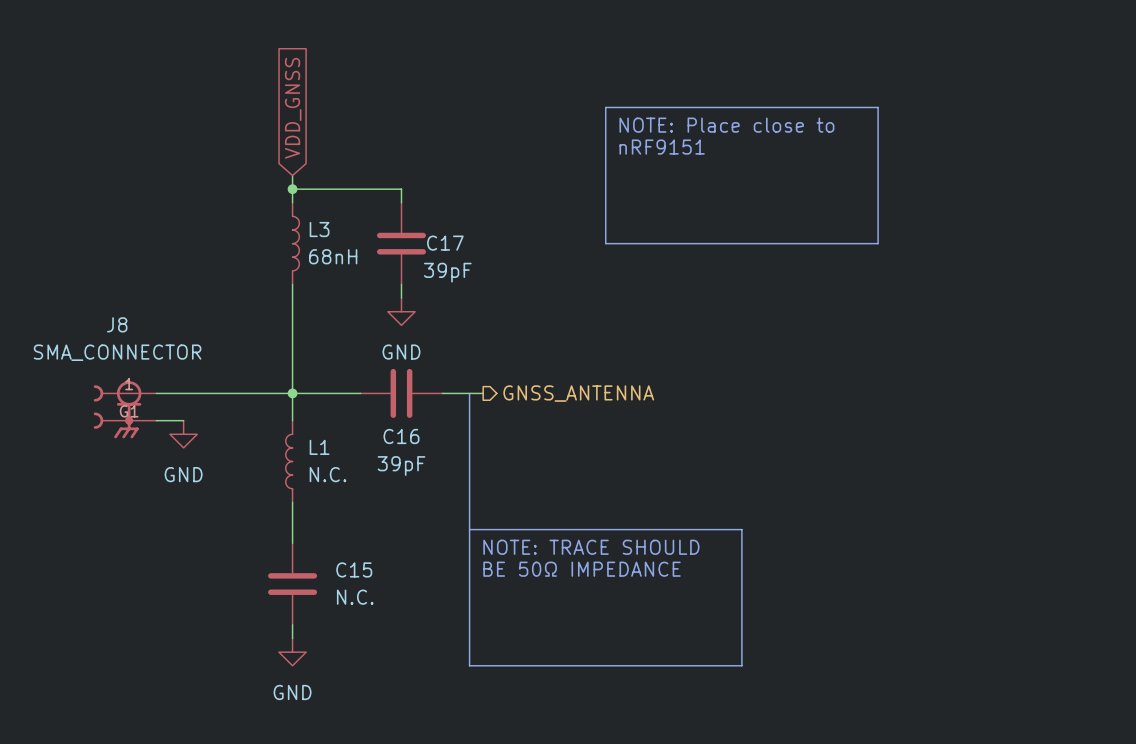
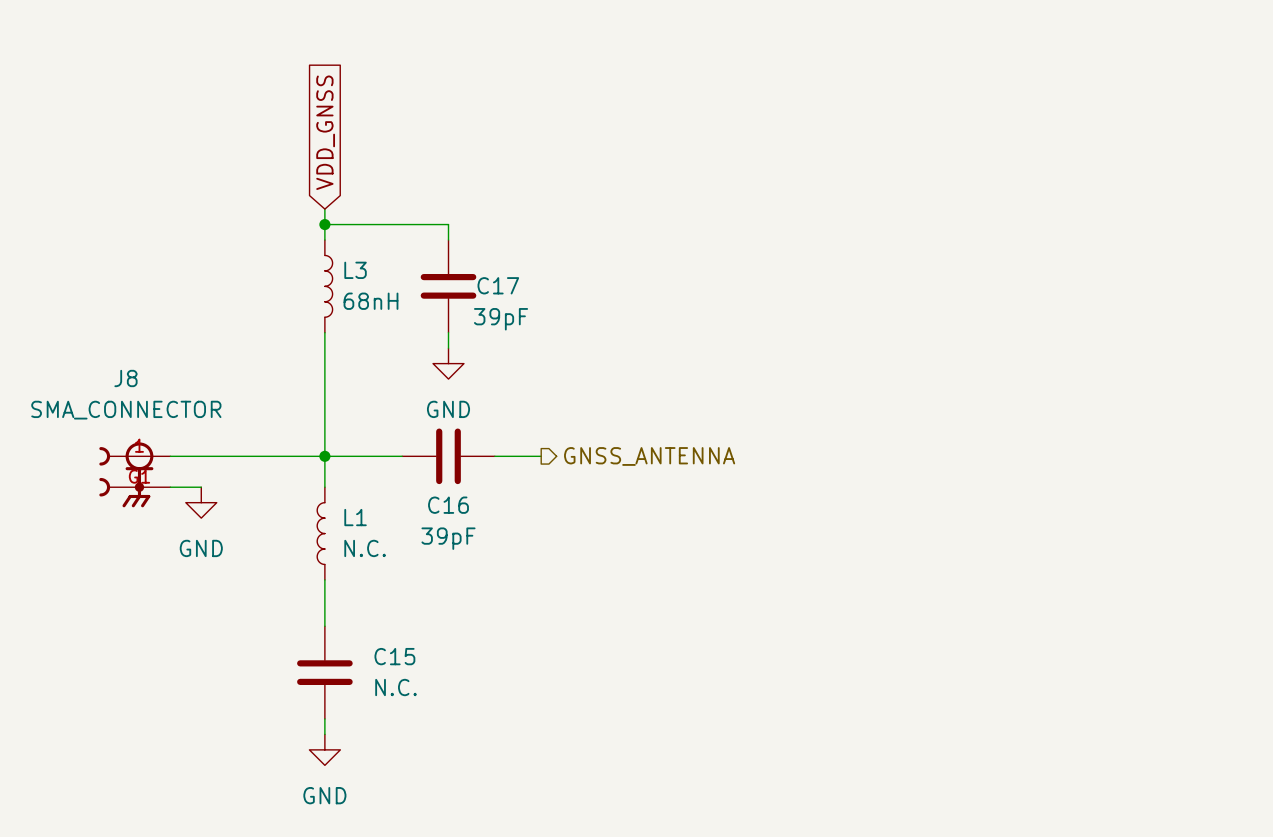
line: (605, 107) (878, 107) (878, 243) (605, 243) (605, 107) -> none
text: NOTE: Place close to (726, 125) -> none
text: nRF9151 (662, 147) -> none
line: (469, 393) (469, 665) (741, 665) (741, 529) (469, 529) -> none
text: NOTE: TRACE SHOULD (591, 547) -> none
text: BE 50Ω IMPEDANCE (582, 569) -> none

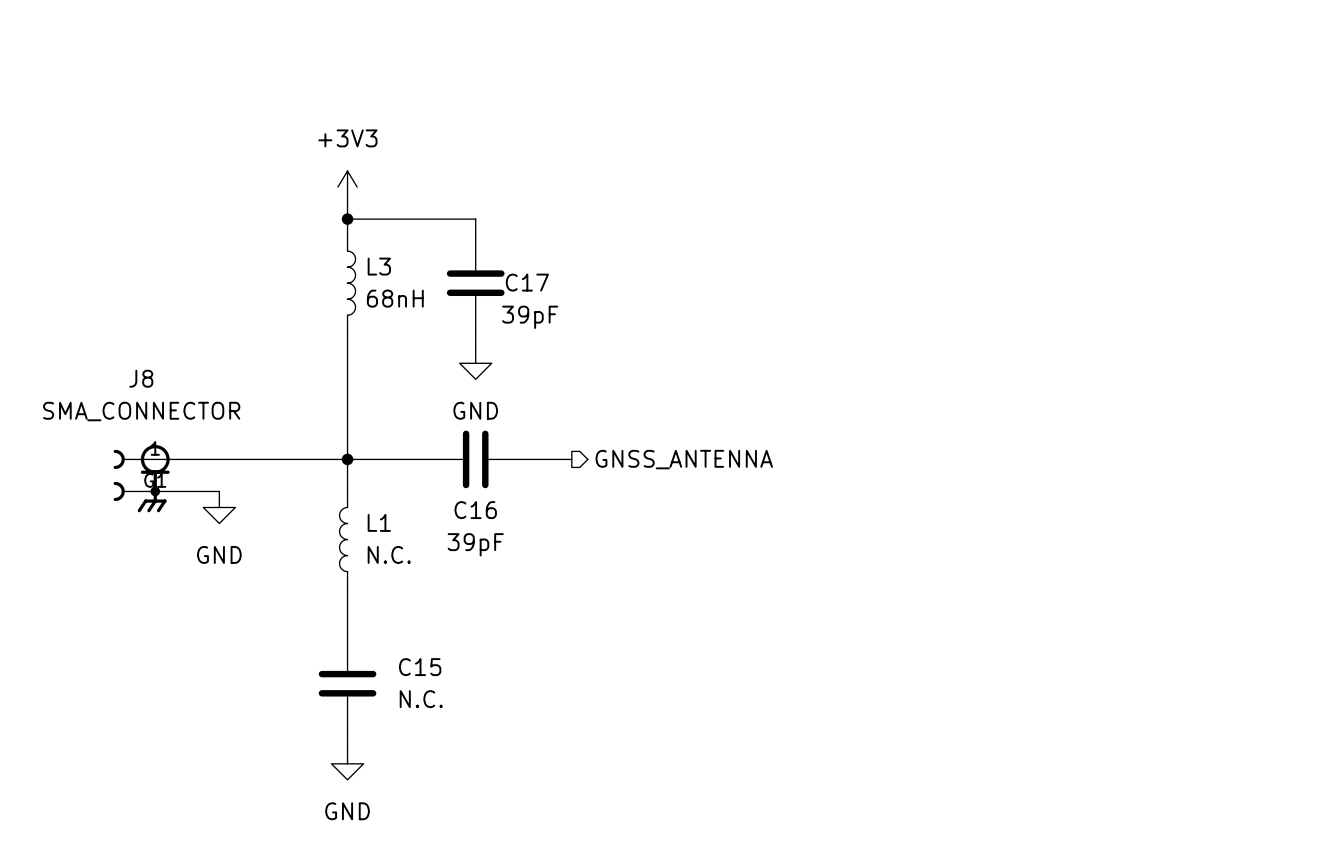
global label: VDD_GNSS (325, 132) -> none
power symbol: none -> +3V3 (347, 187)

